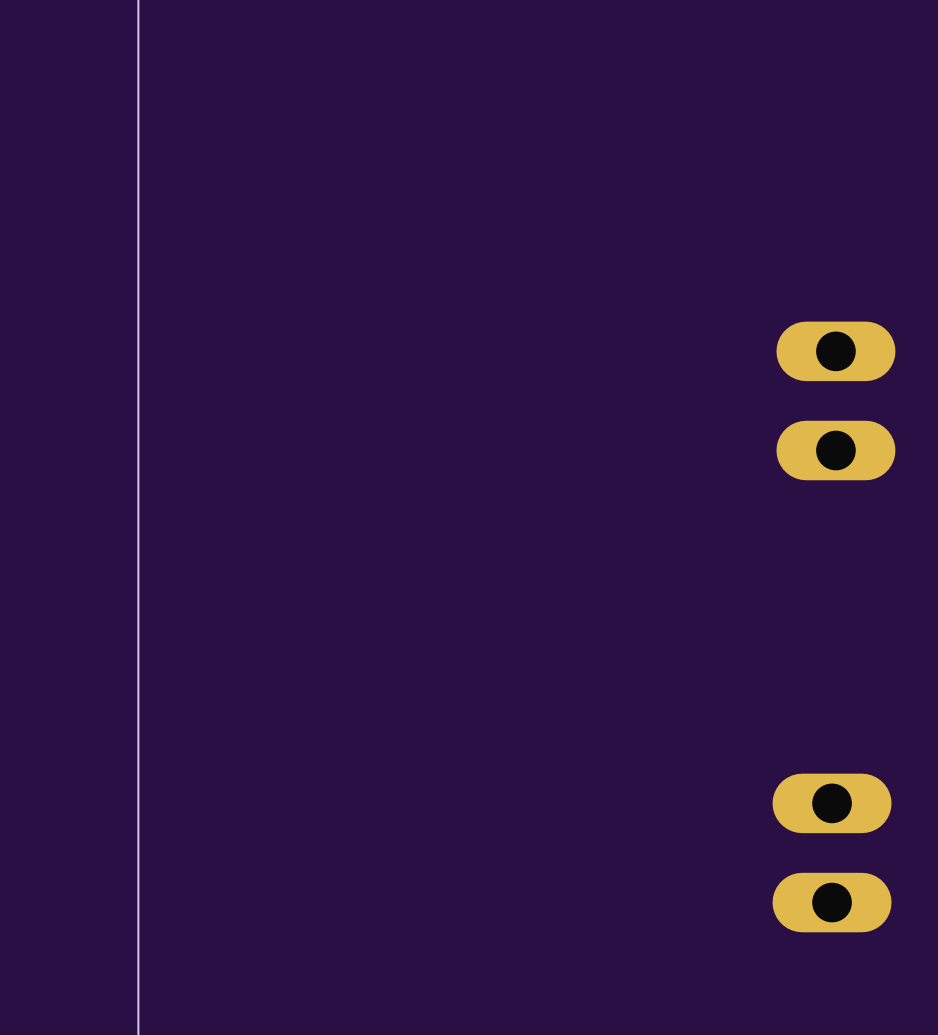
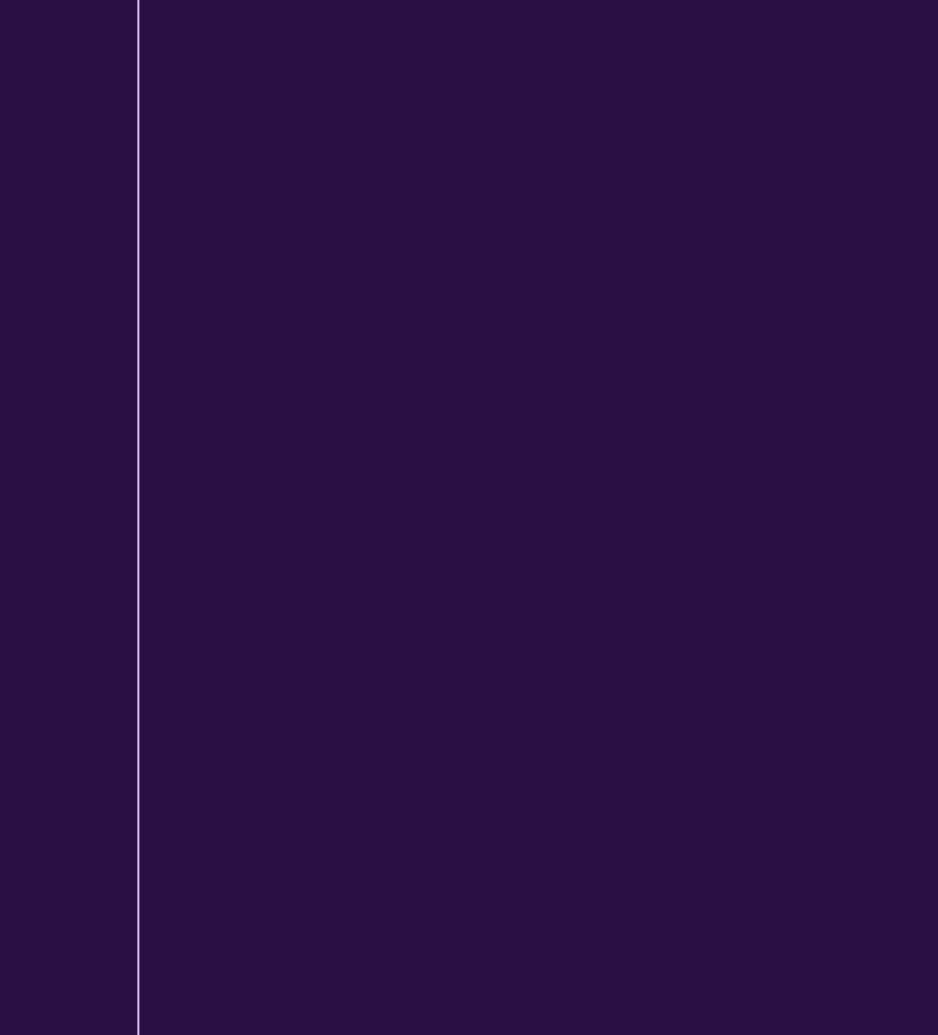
part: (835, 400) -> none
part: (832, 852) -> none

